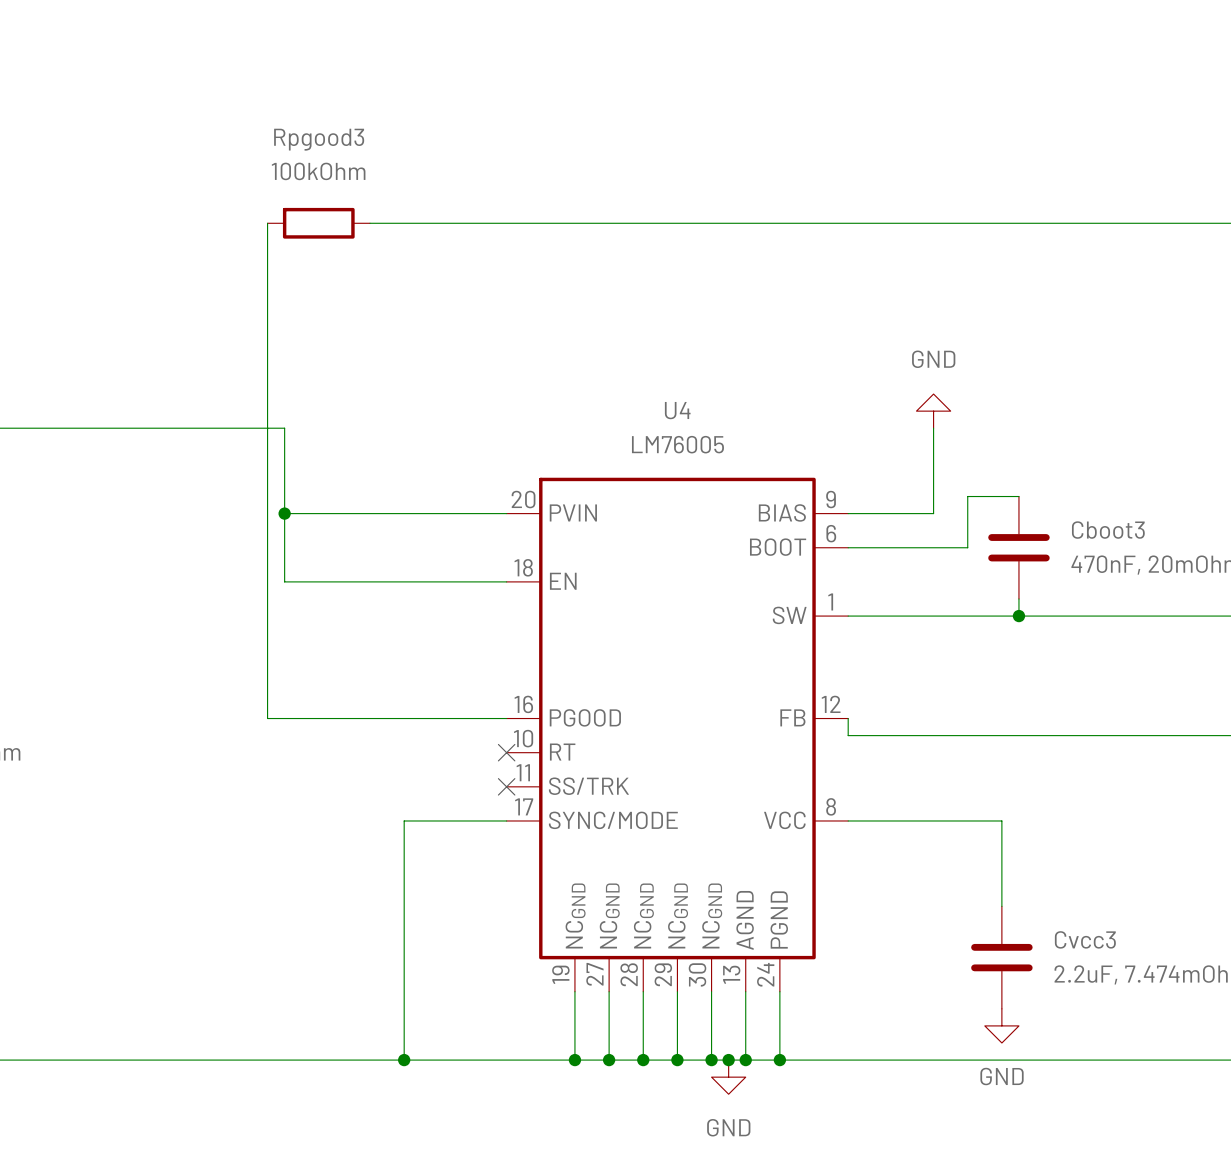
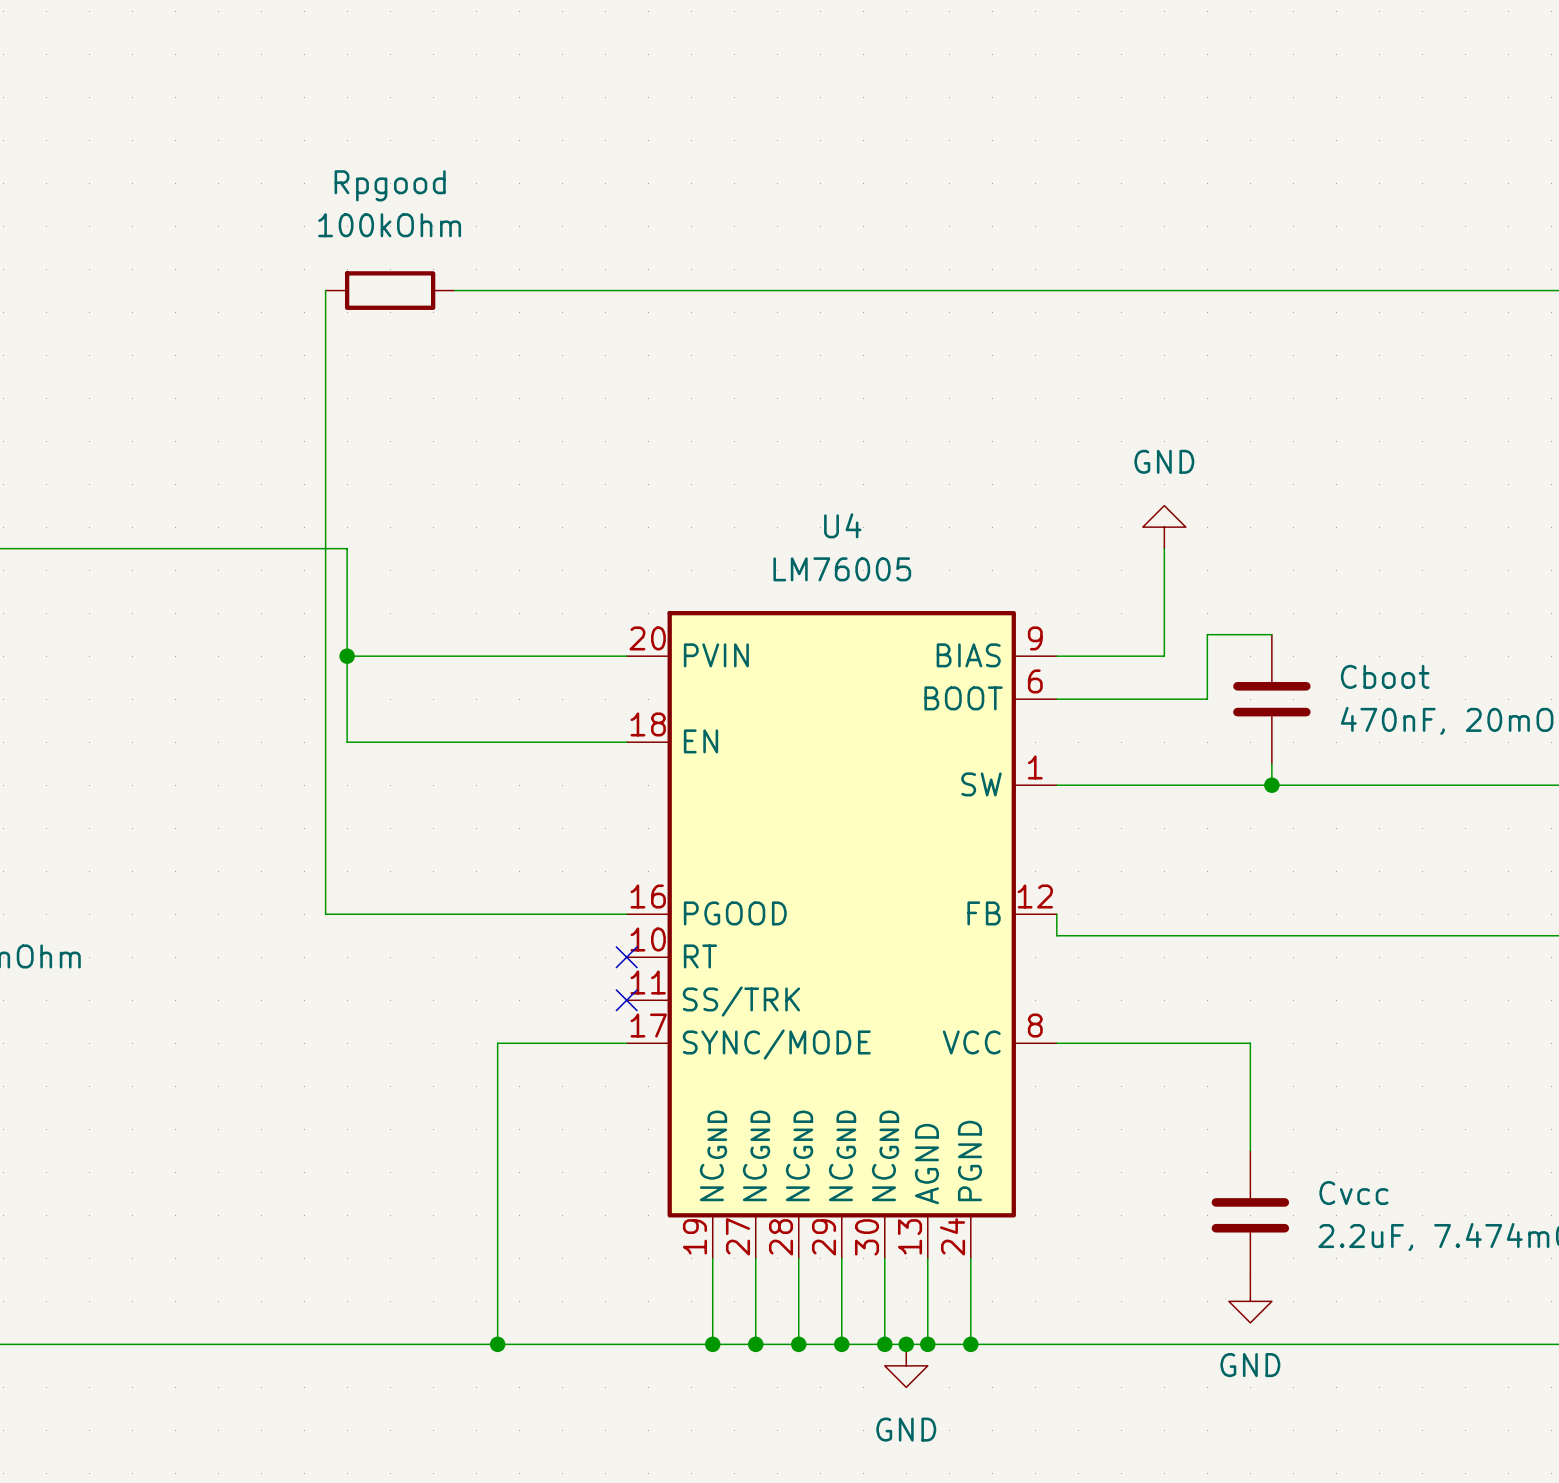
Rpgood3 name: Rpgood3 (319, 139) -> Rpgood (390, 185)
Cboot3 name: Cboot3 (1108, 530) -> Cboot (1385, 676)
Cvcc3 name: Cvcc3 (1085, 939) -> Cvcc (1353, 1193)

